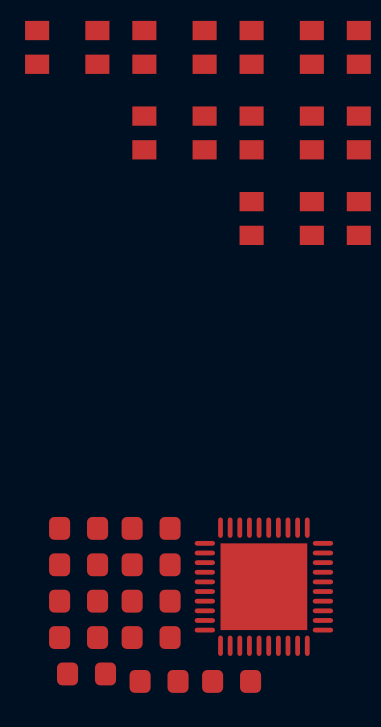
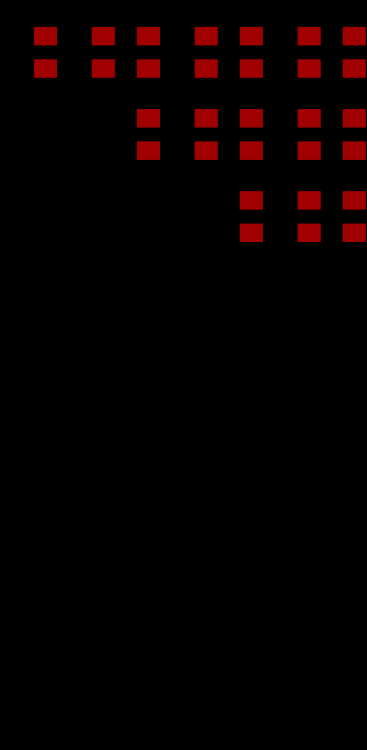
part: (78, 528) -> none
part: (151, 528) -> none
part: (78, 564) -> none
part: (151, 564) -> none
part: (263, 586) -> none
part: (78, 601) -> none
part: (151, 601) -> none
part: (78, 637) -> none
part: (151, 637) -> none
part: (86, 673) -> none
part: (159, 681) -> none
part: (231, 681) -> none

